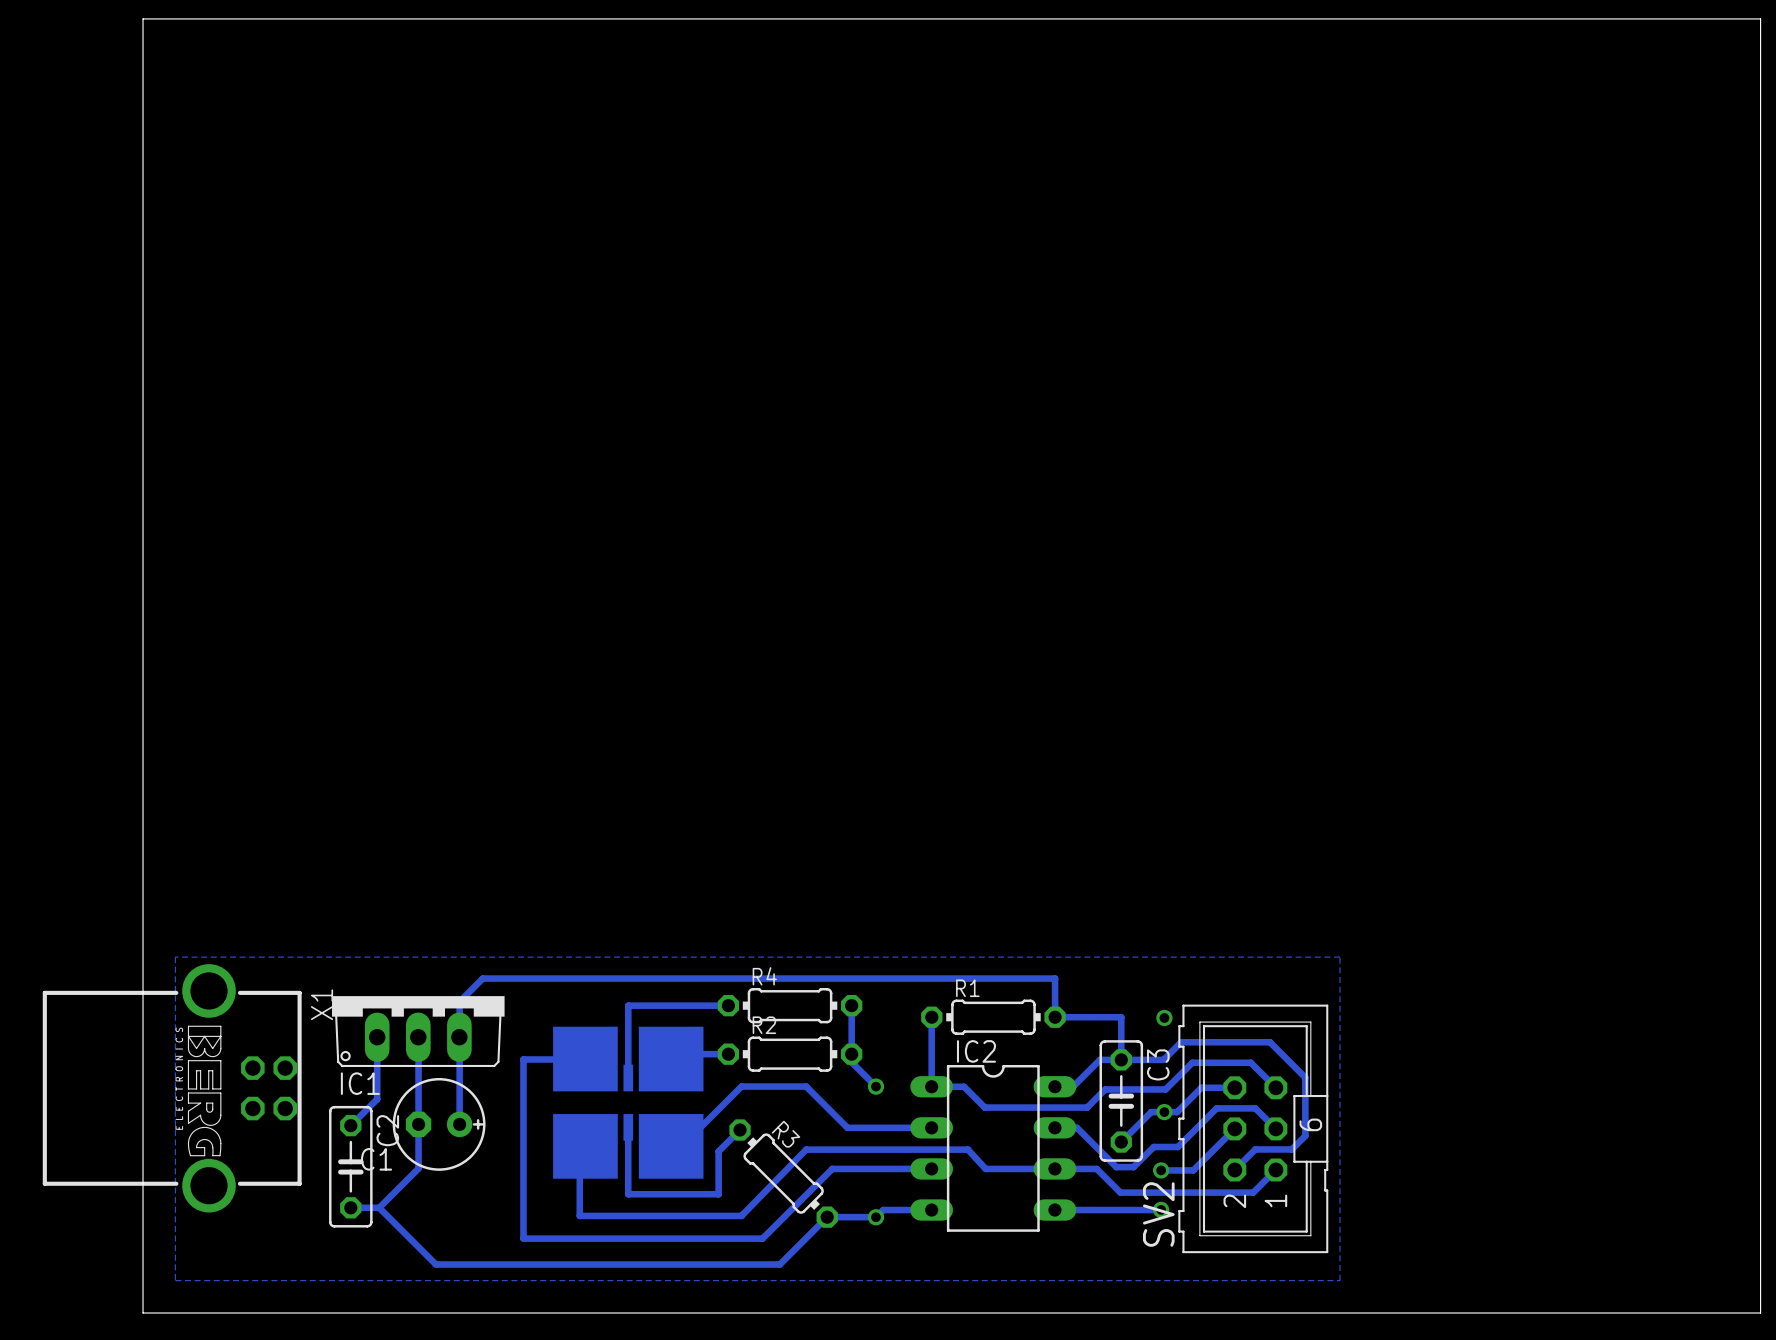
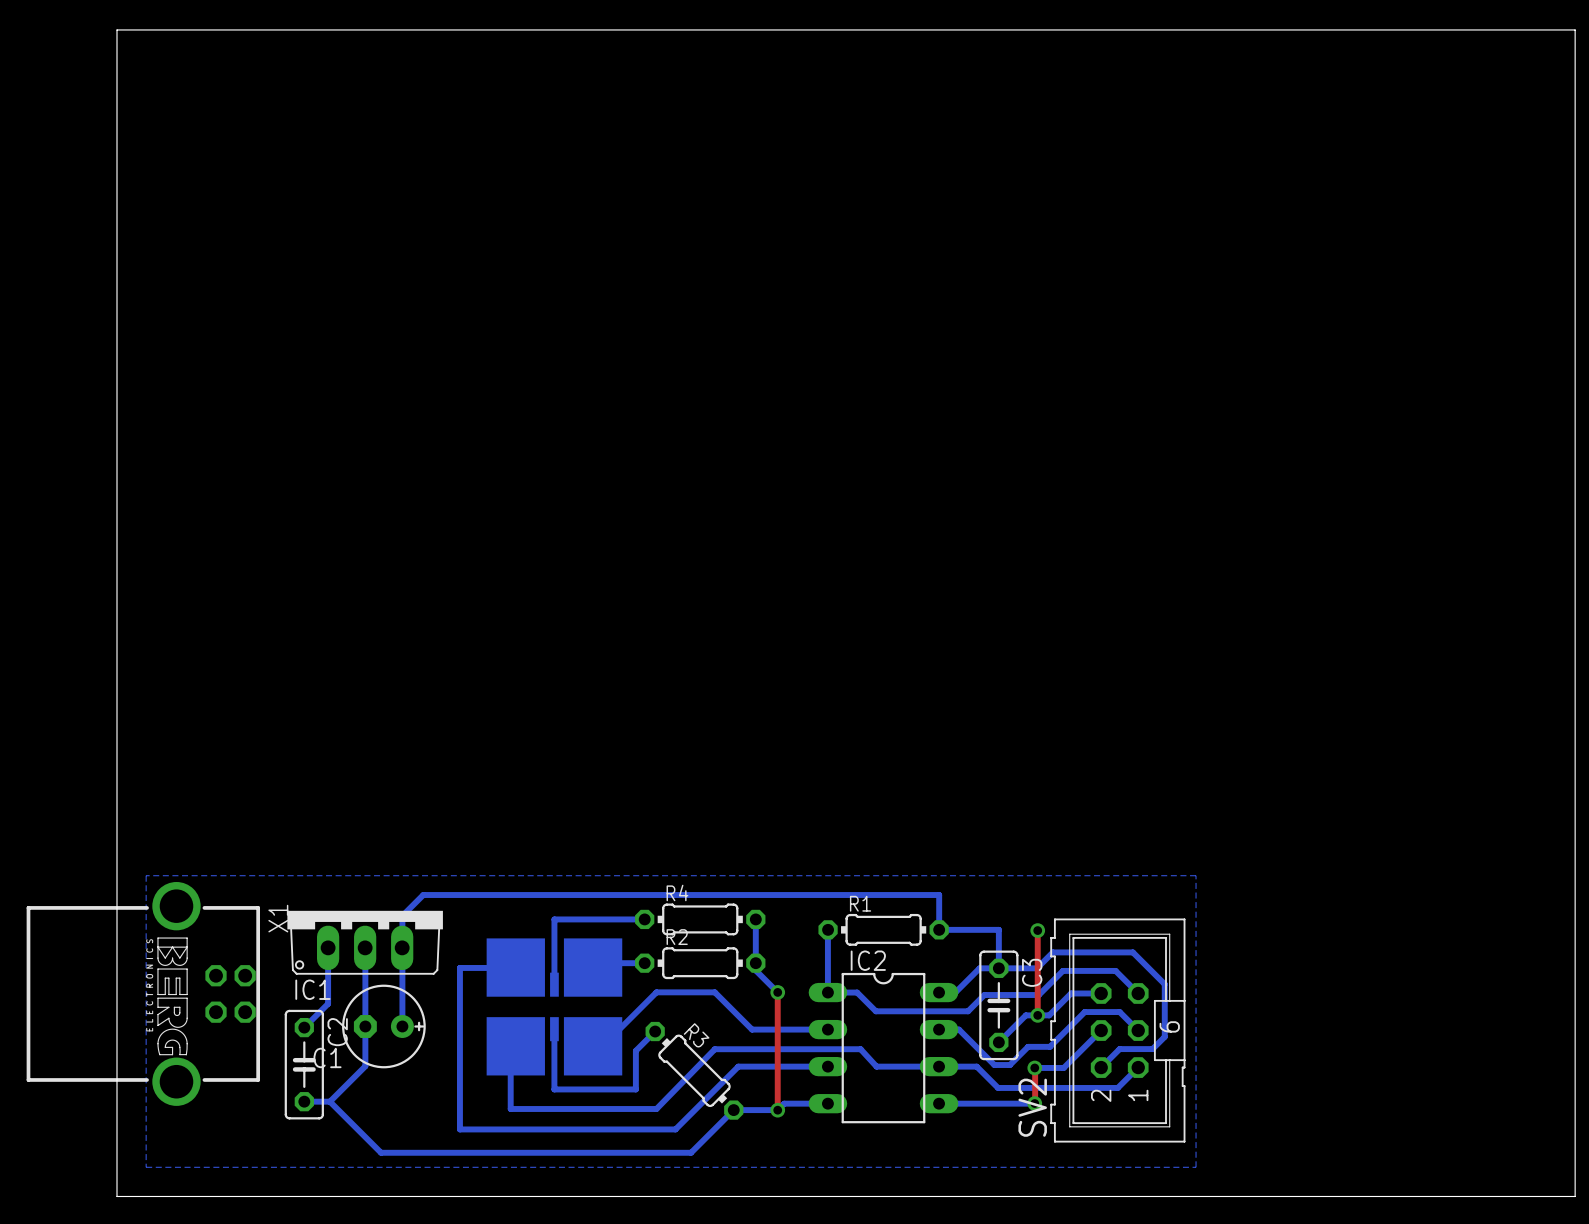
top track: none -> (1037, 930) (1037, 1015)
top track: none -> (777, 992) (777, 1110)
top track: none -> (1035, 1067) (1035, 1103)

